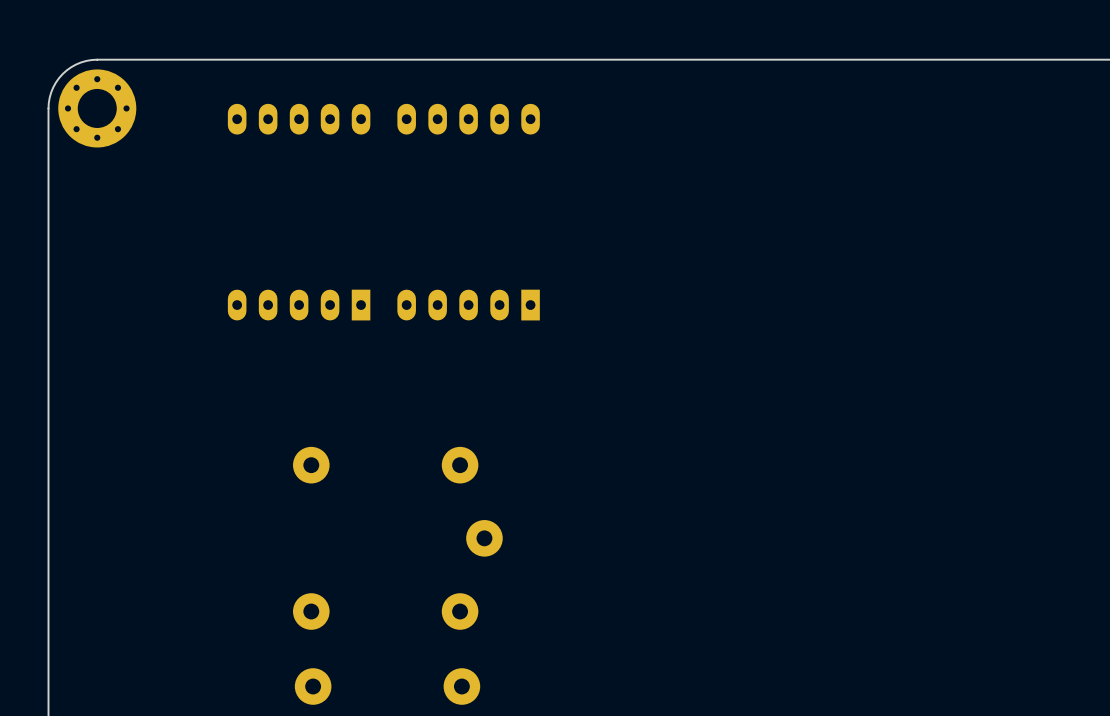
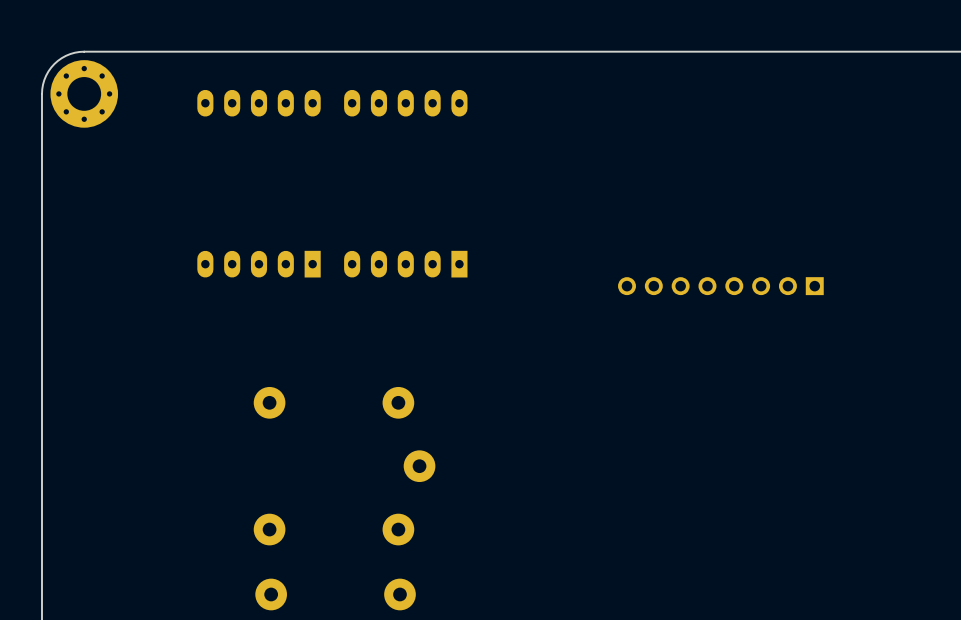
part: none -> (720, 286)

